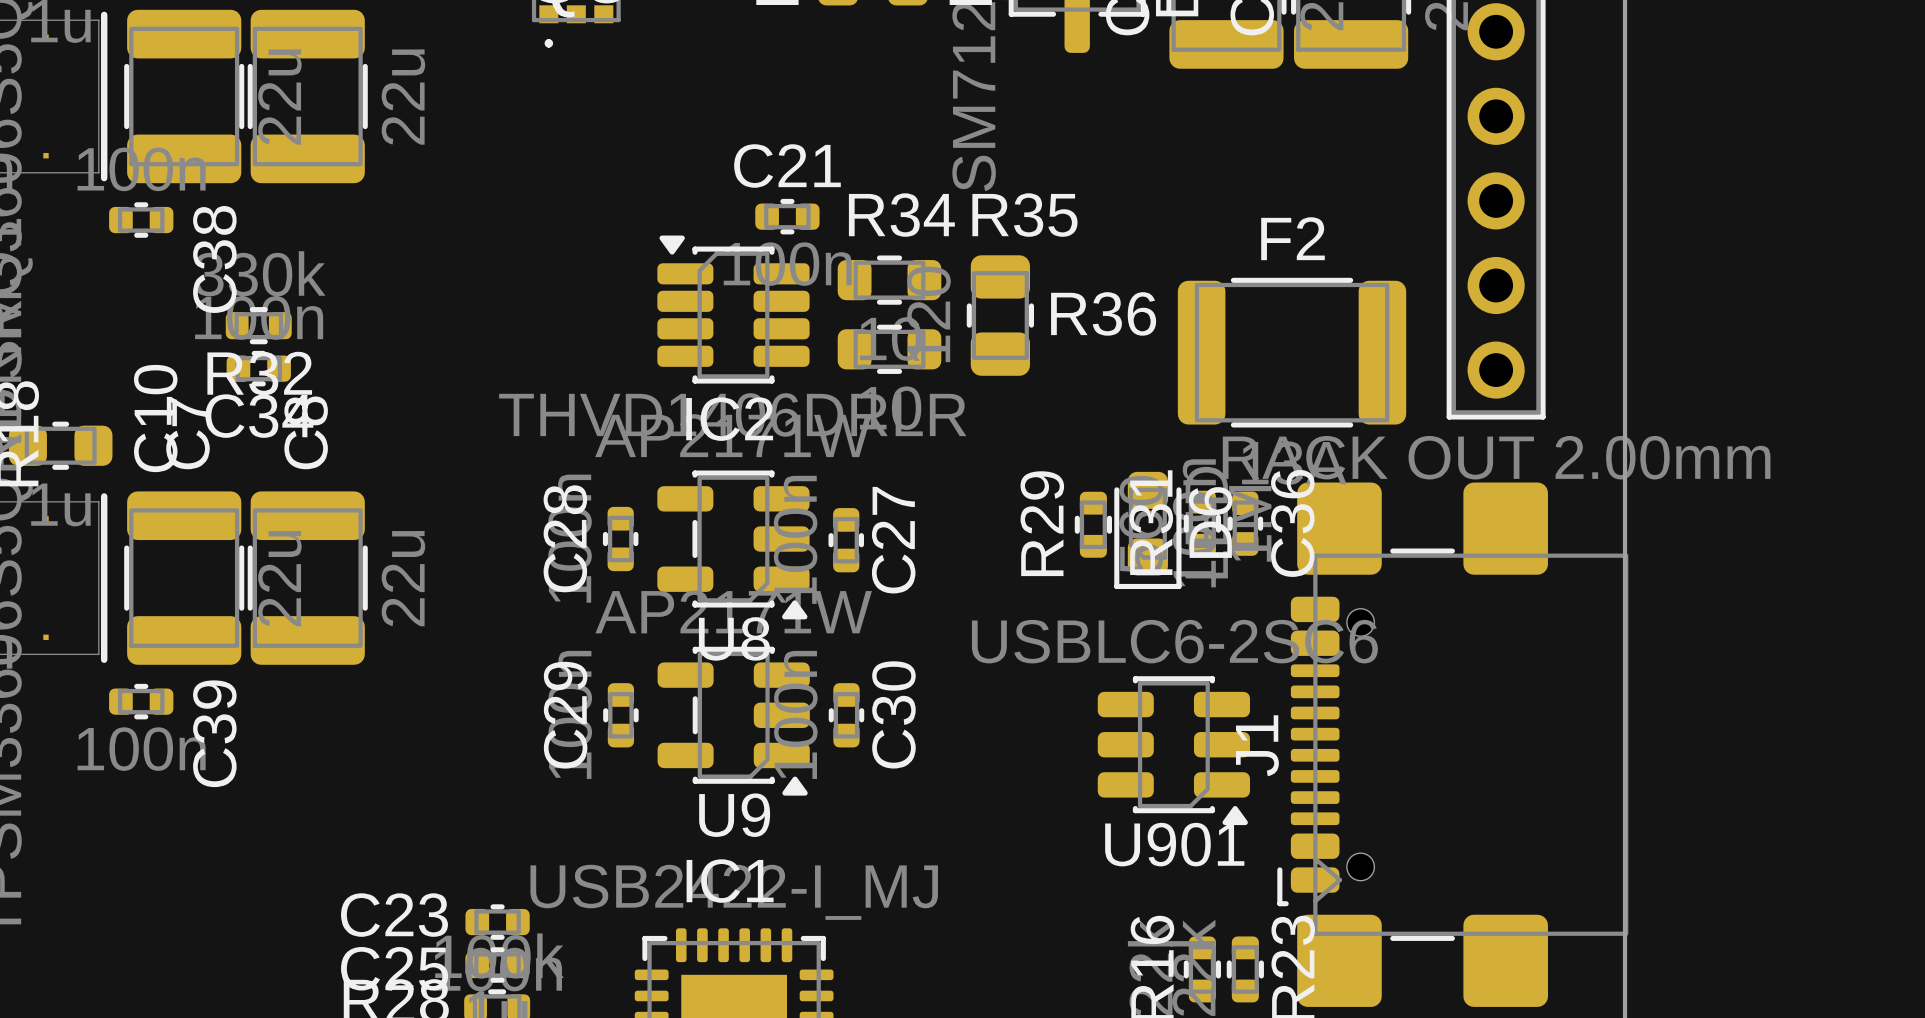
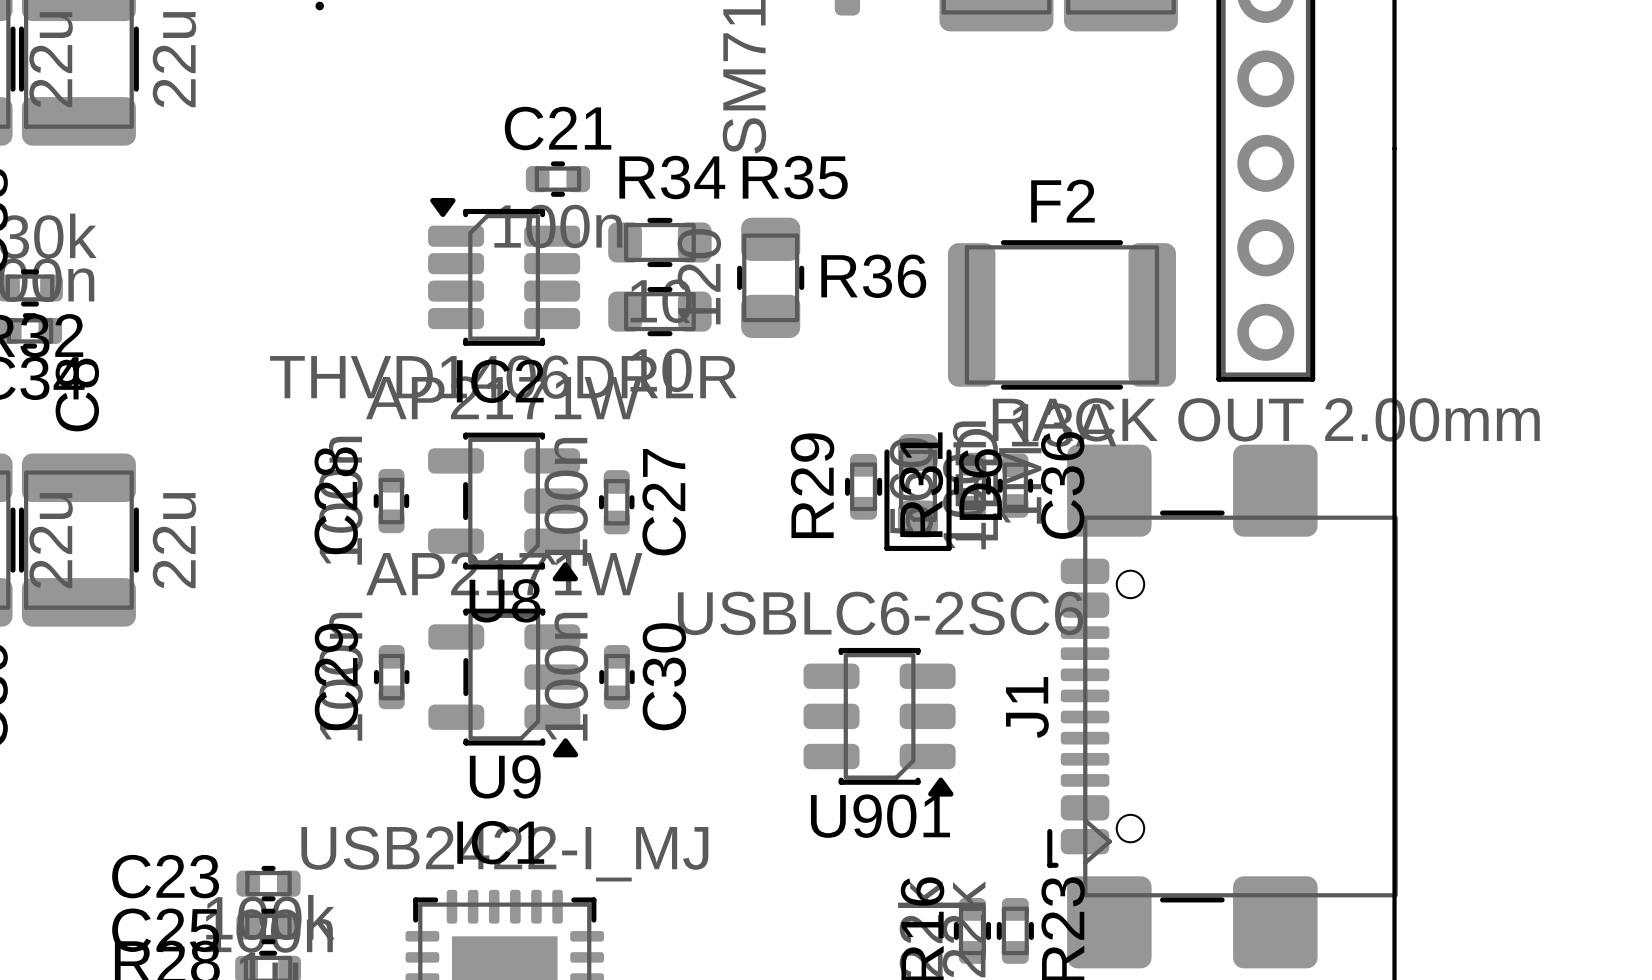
U901 position: (1173, 750) -> (879, 722)

